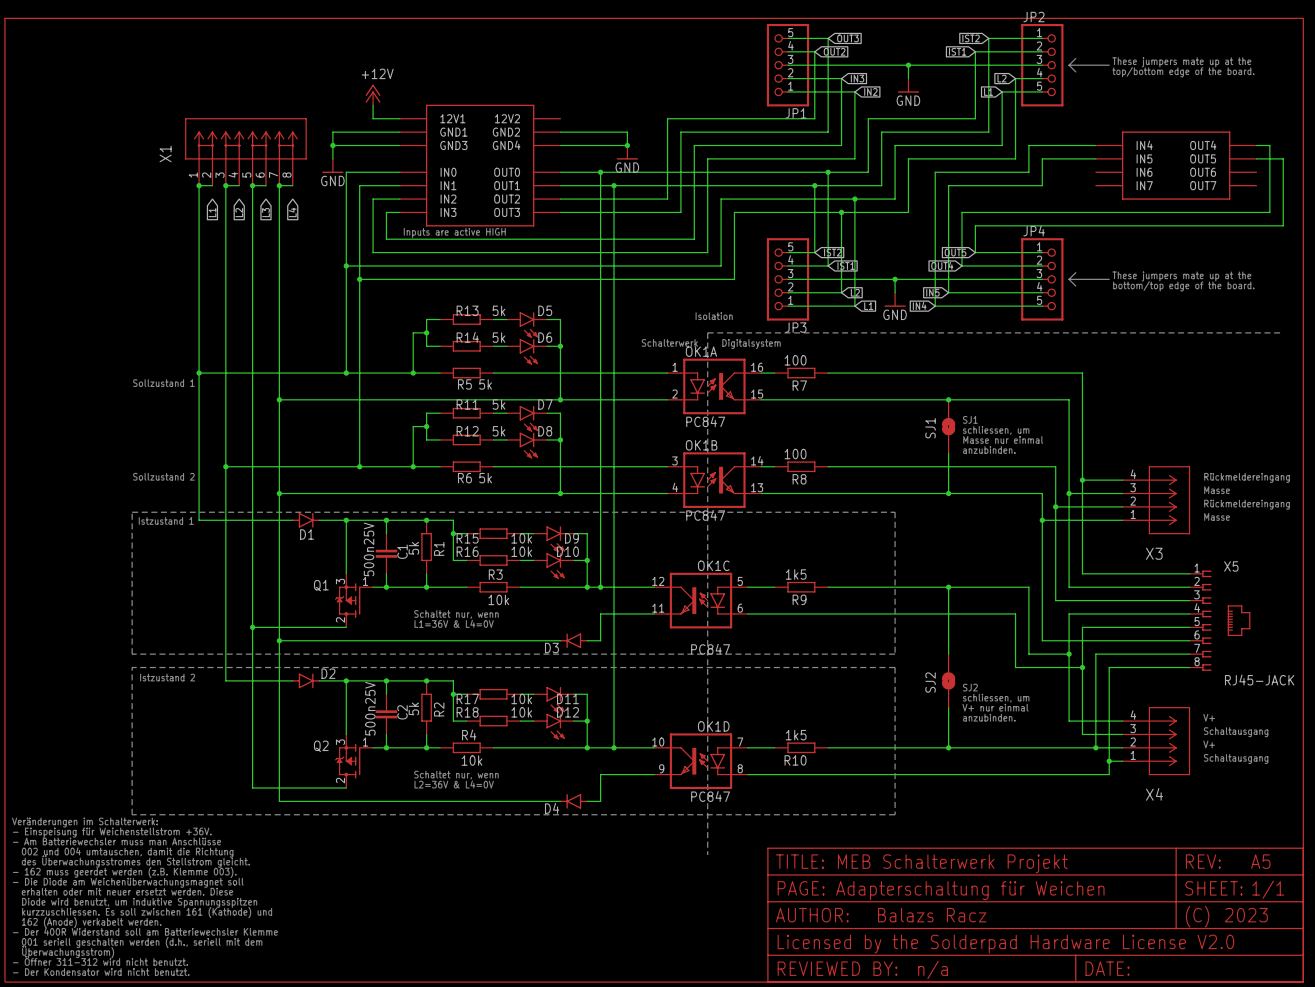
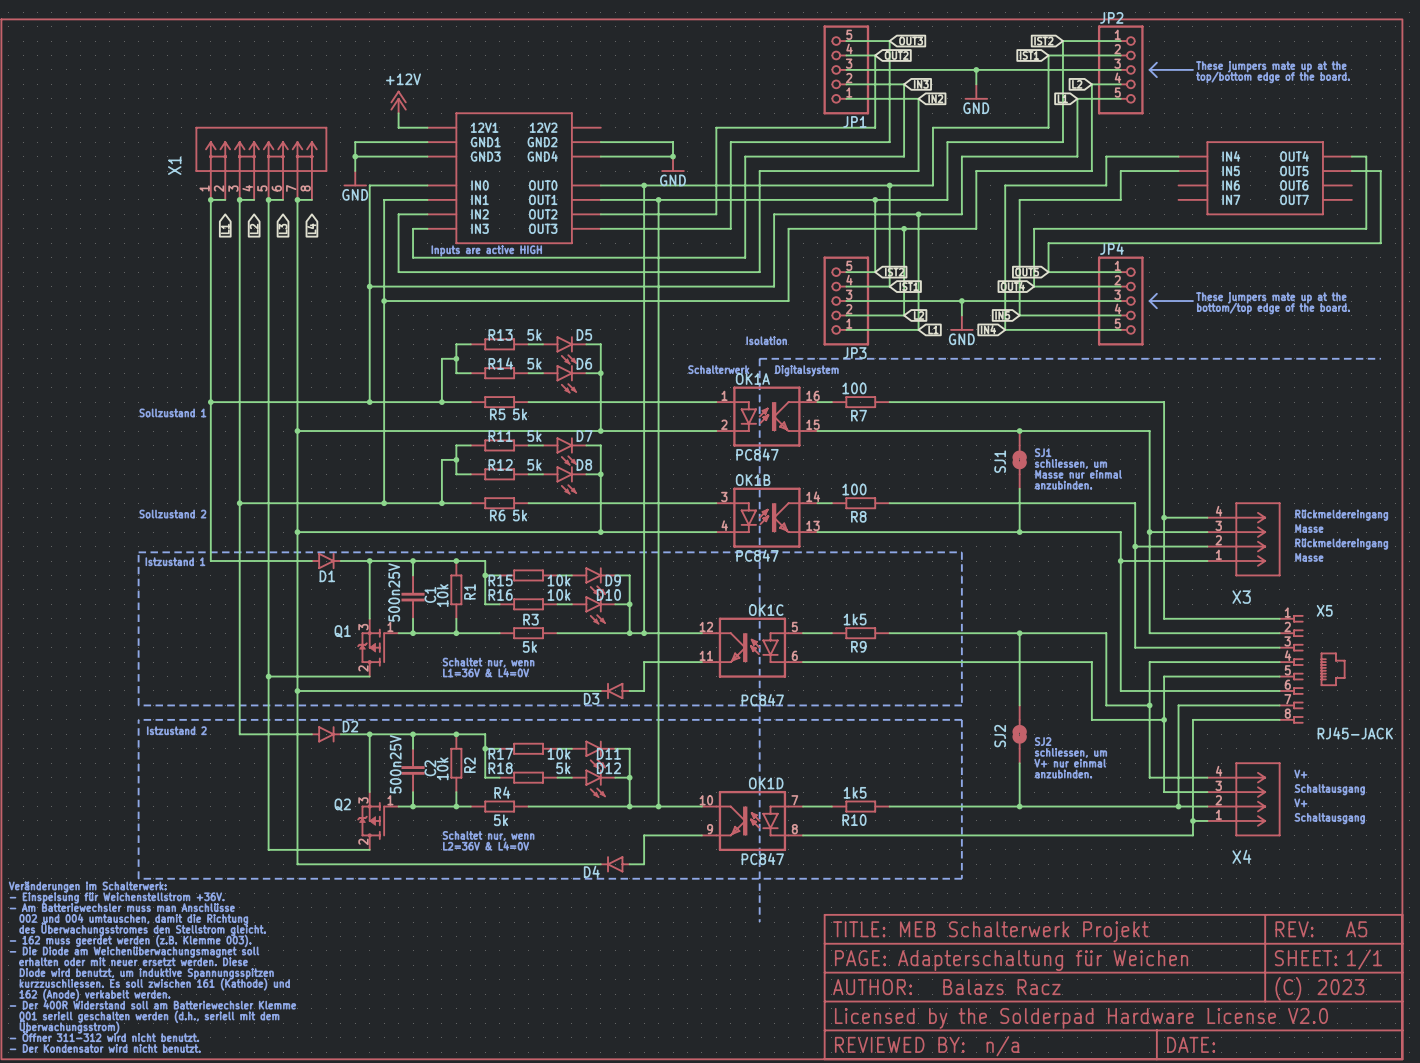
R1 value: 5k (413, 548) -> 10k (442, 595)
R3 value: 10k (498, 599) -> 5k (529, 646)
R2 value: 5k (413, 708) -> 10k (442, 768)
R18 value: 10k (521, 712) -> 5k (563, 768)
R4 value: 10k (472, 760) -> 5k (501, 820)

